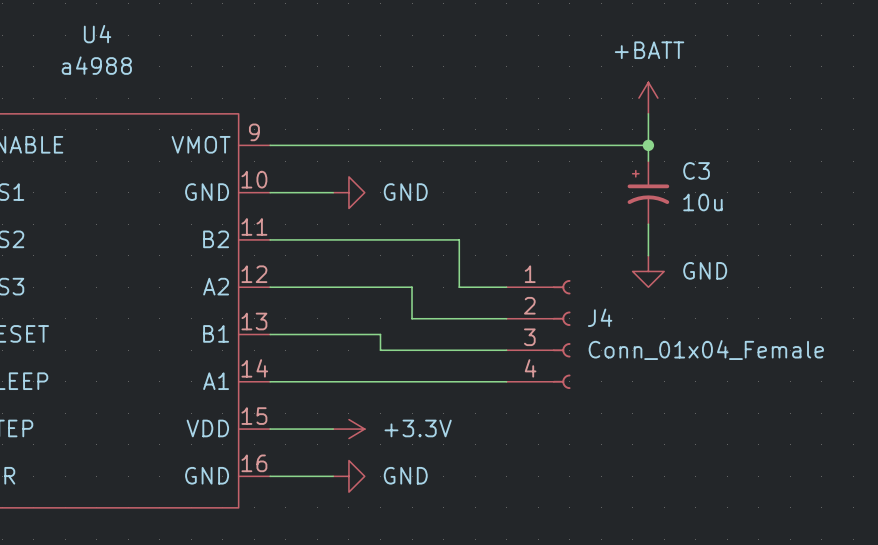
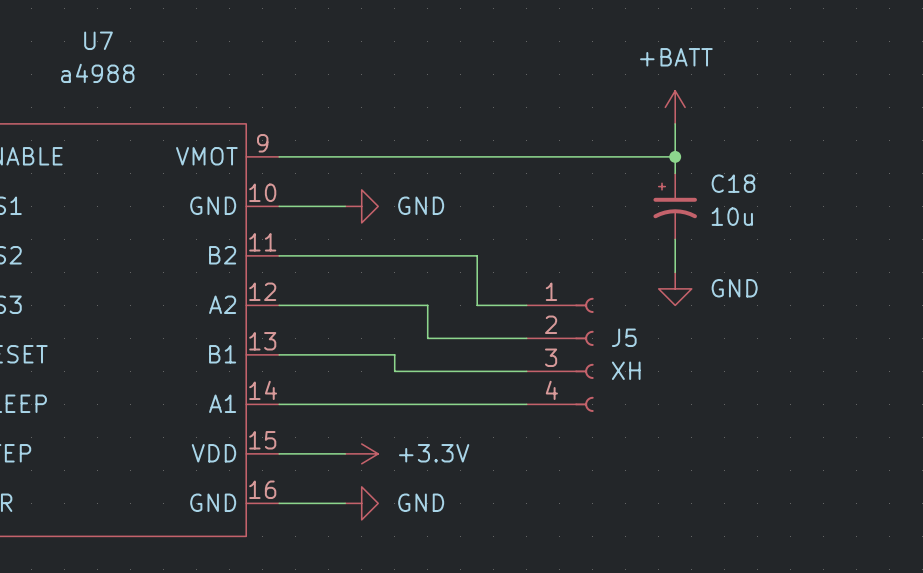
U4 name: U4 (97, 34) -> U7 (98, 40)
C3 name: C3 (696, 170) -> C18 (733, 183)
J4 name: J4 (600, 317) -> J5 (624, 337)
J4 value: Conn_01x04_Female (706, 350) -> XH (626, 370)

